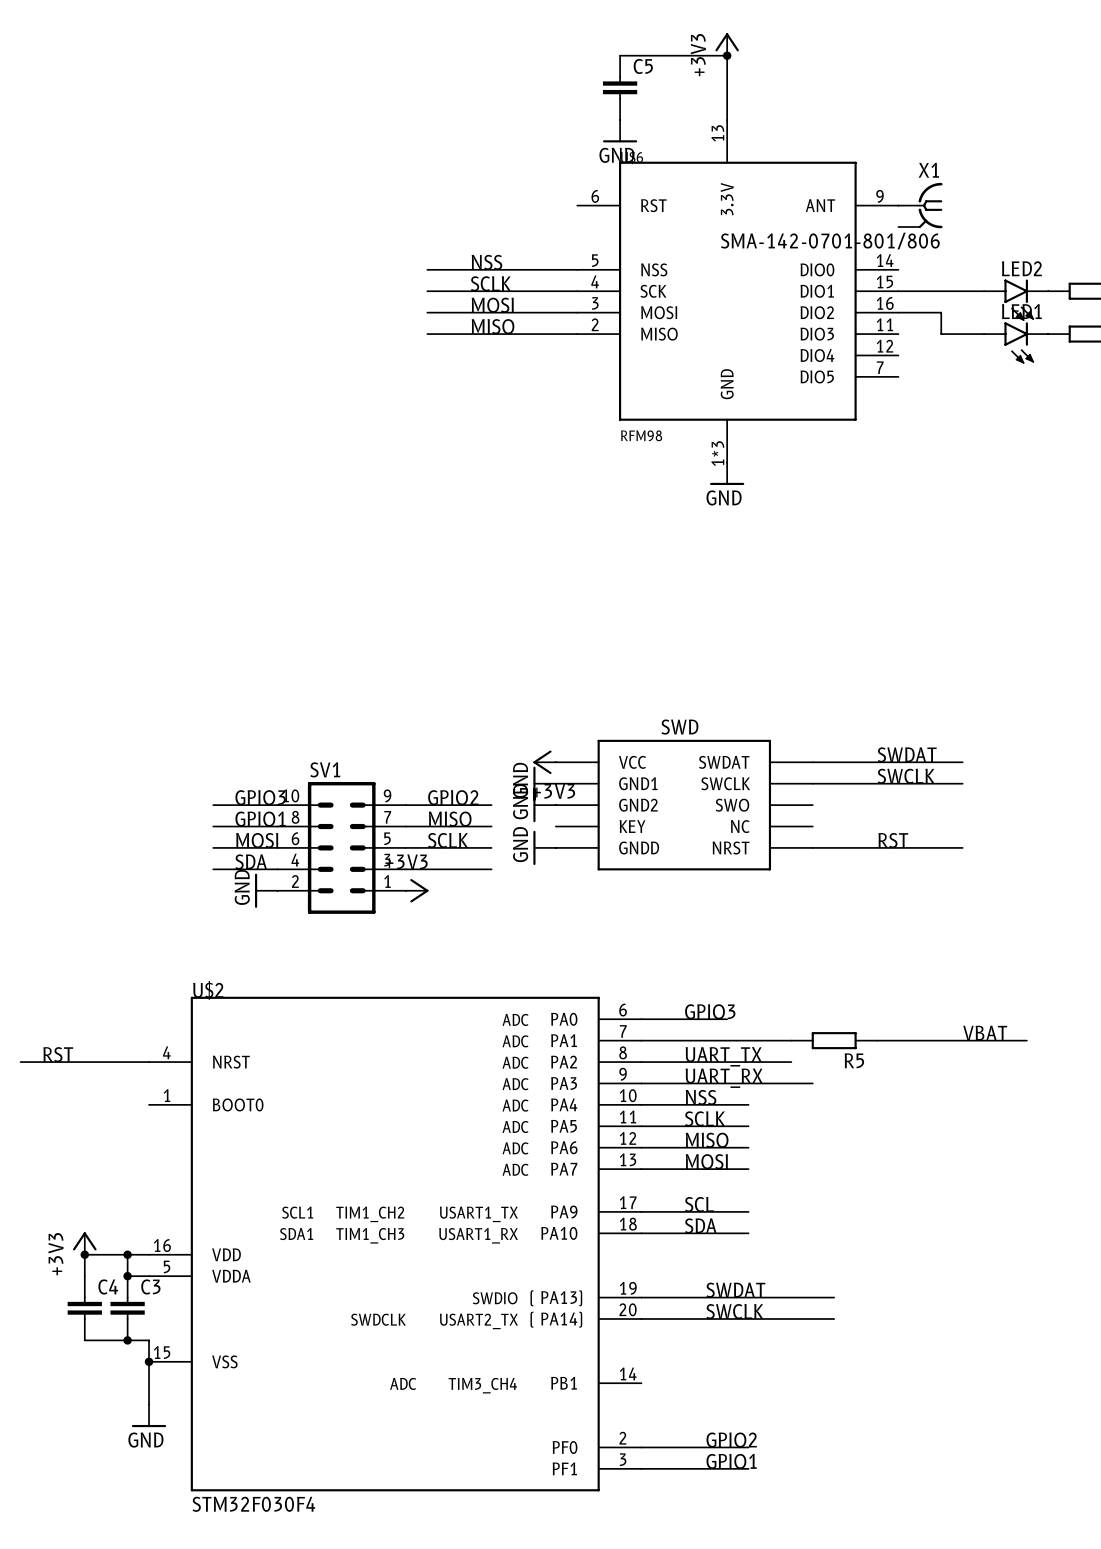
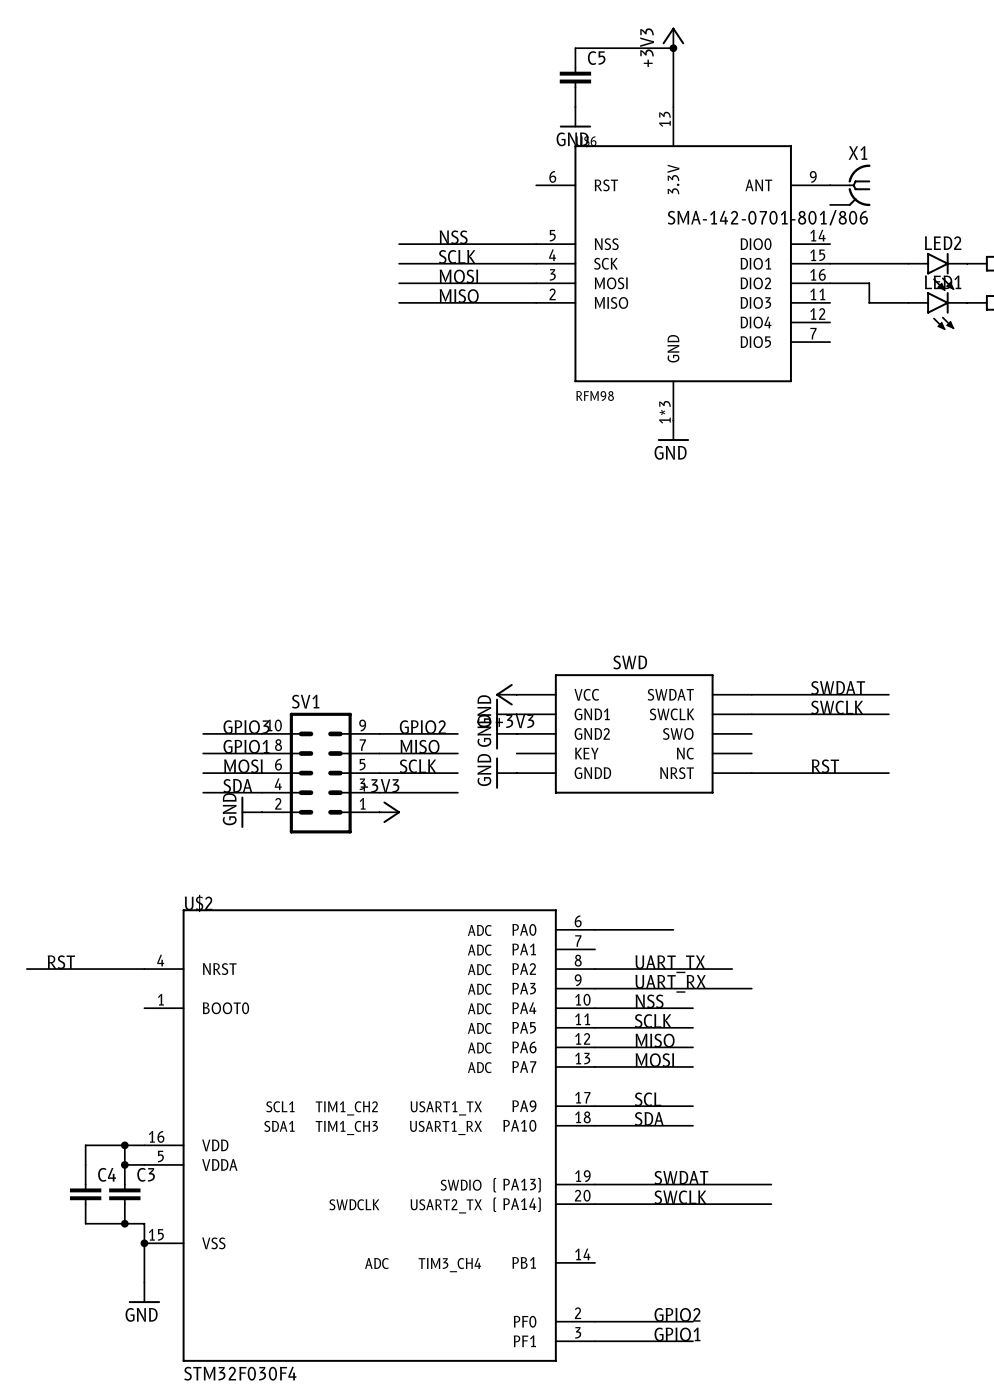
label: GPIO3 (710, 1011) -> none
label: VBAT (985, 1033) -> none
wire: (641, 1040) (791, 1040) -> none
R5: (834, 1040) -> none
wire: (877, 1040) (1026, 1040) -> none
power symbol: +3V3 (84, 1243) -> none
junction: (84, 1254) -> none

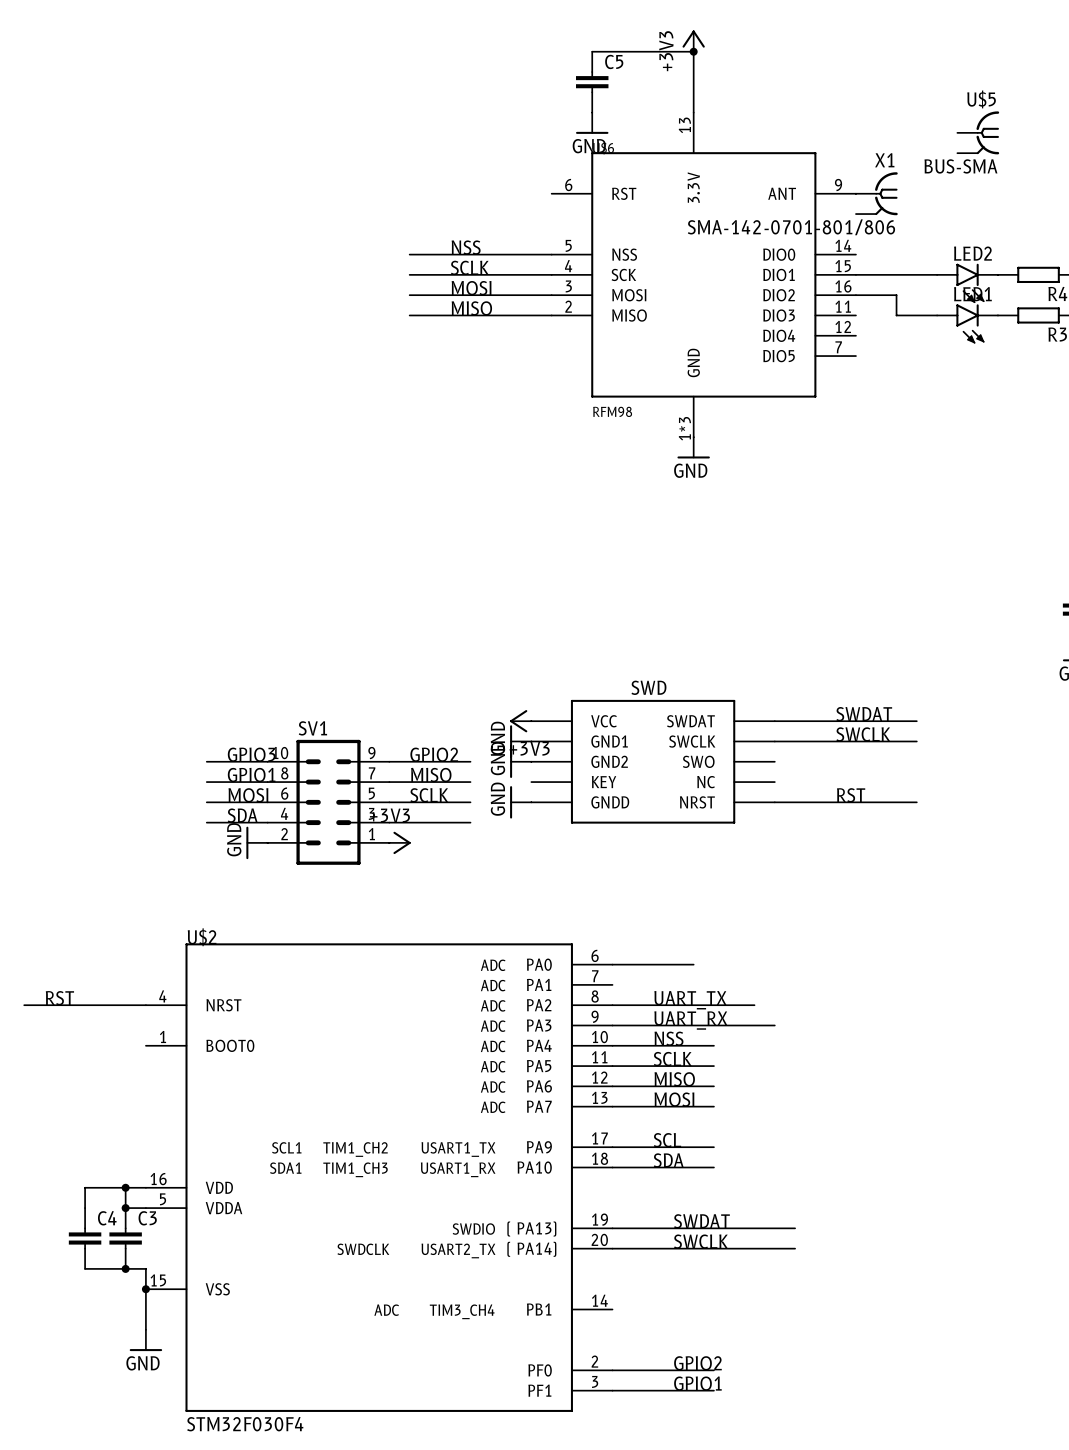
U$5: none -> BUS-SMA (978, 132)

